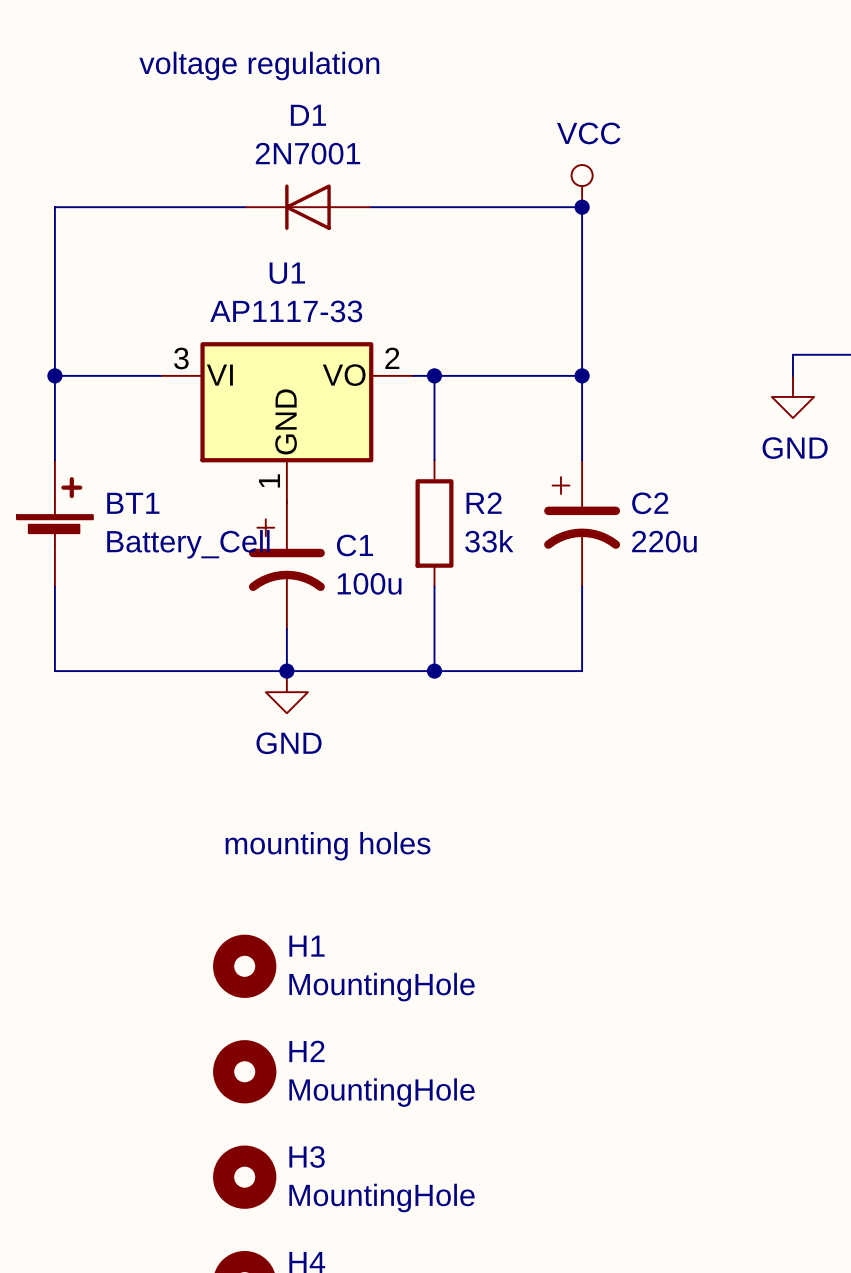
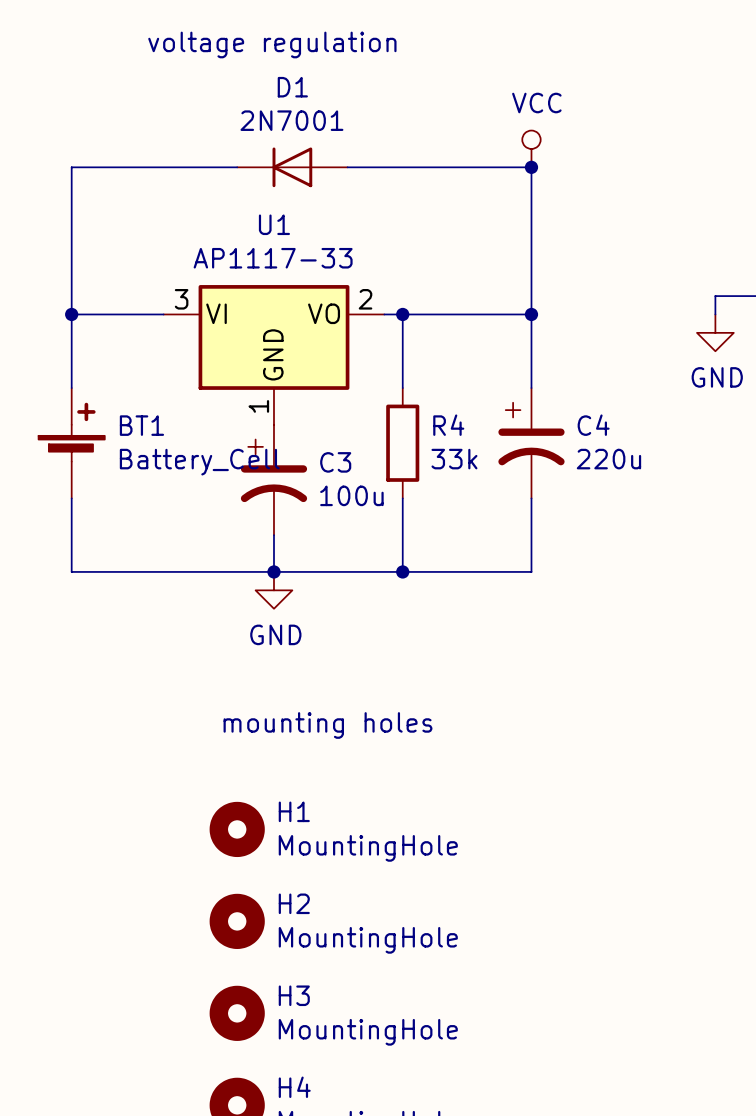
R2 name: R2 (484, 503) -> R4 (448, 425)
C2 name: C2 (650, 503) -> C4 (593, 425)
C1 name: C1 (355, 545) -> C3 (335, 462)

